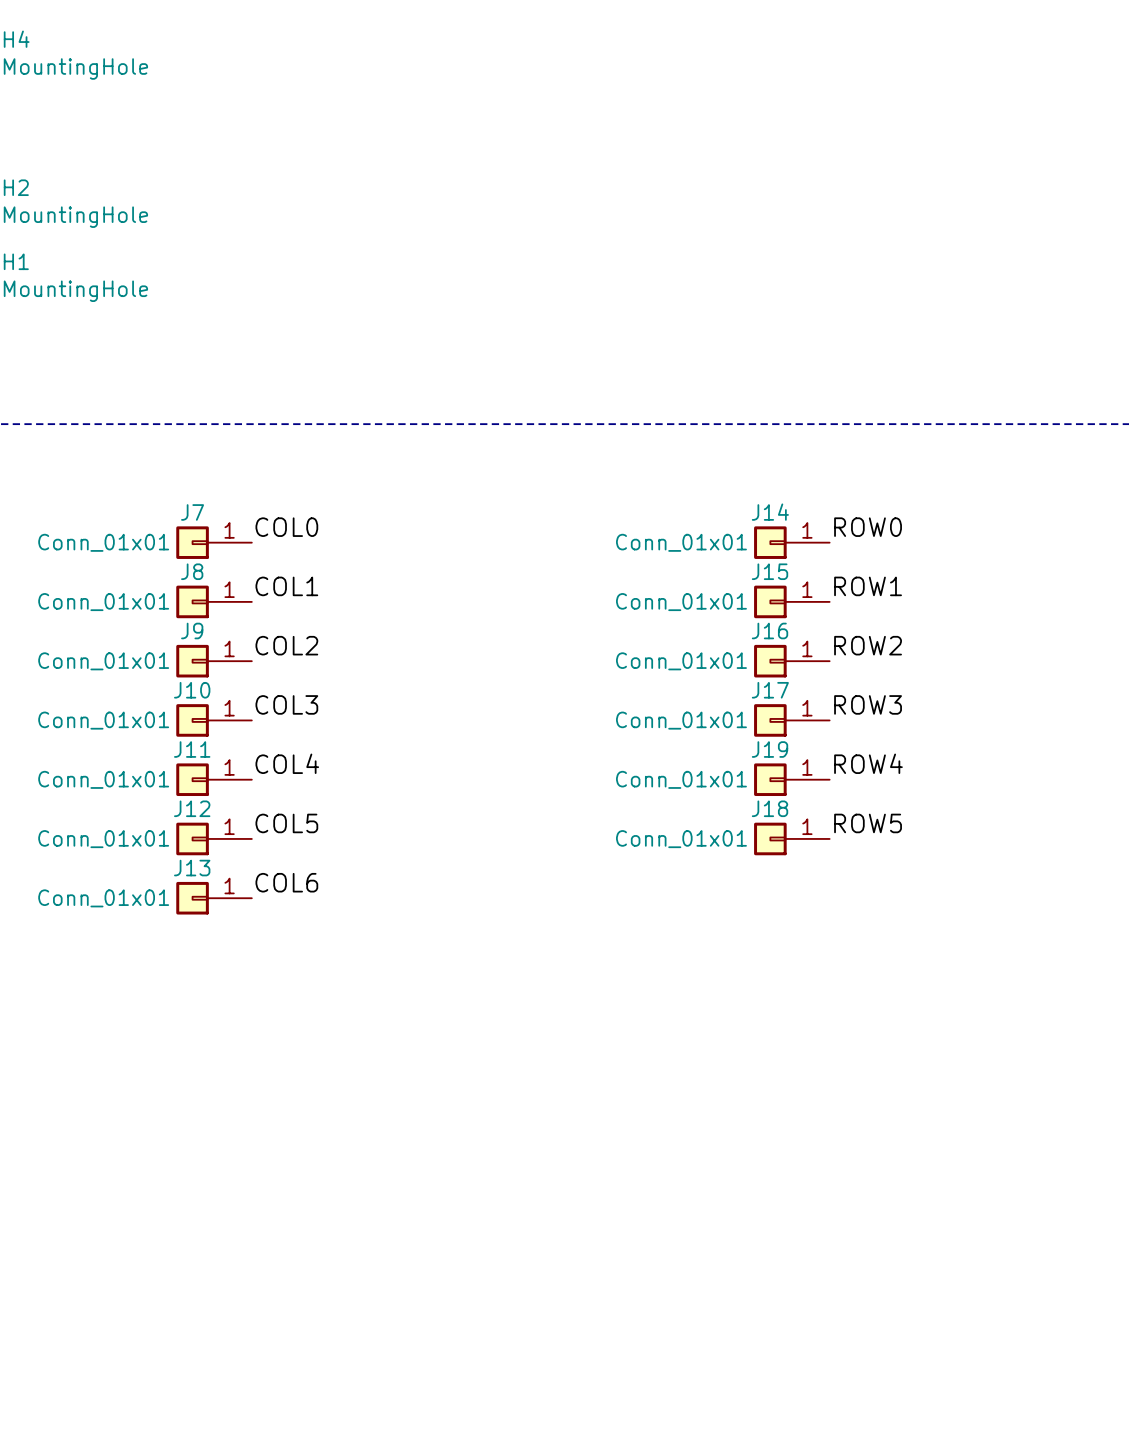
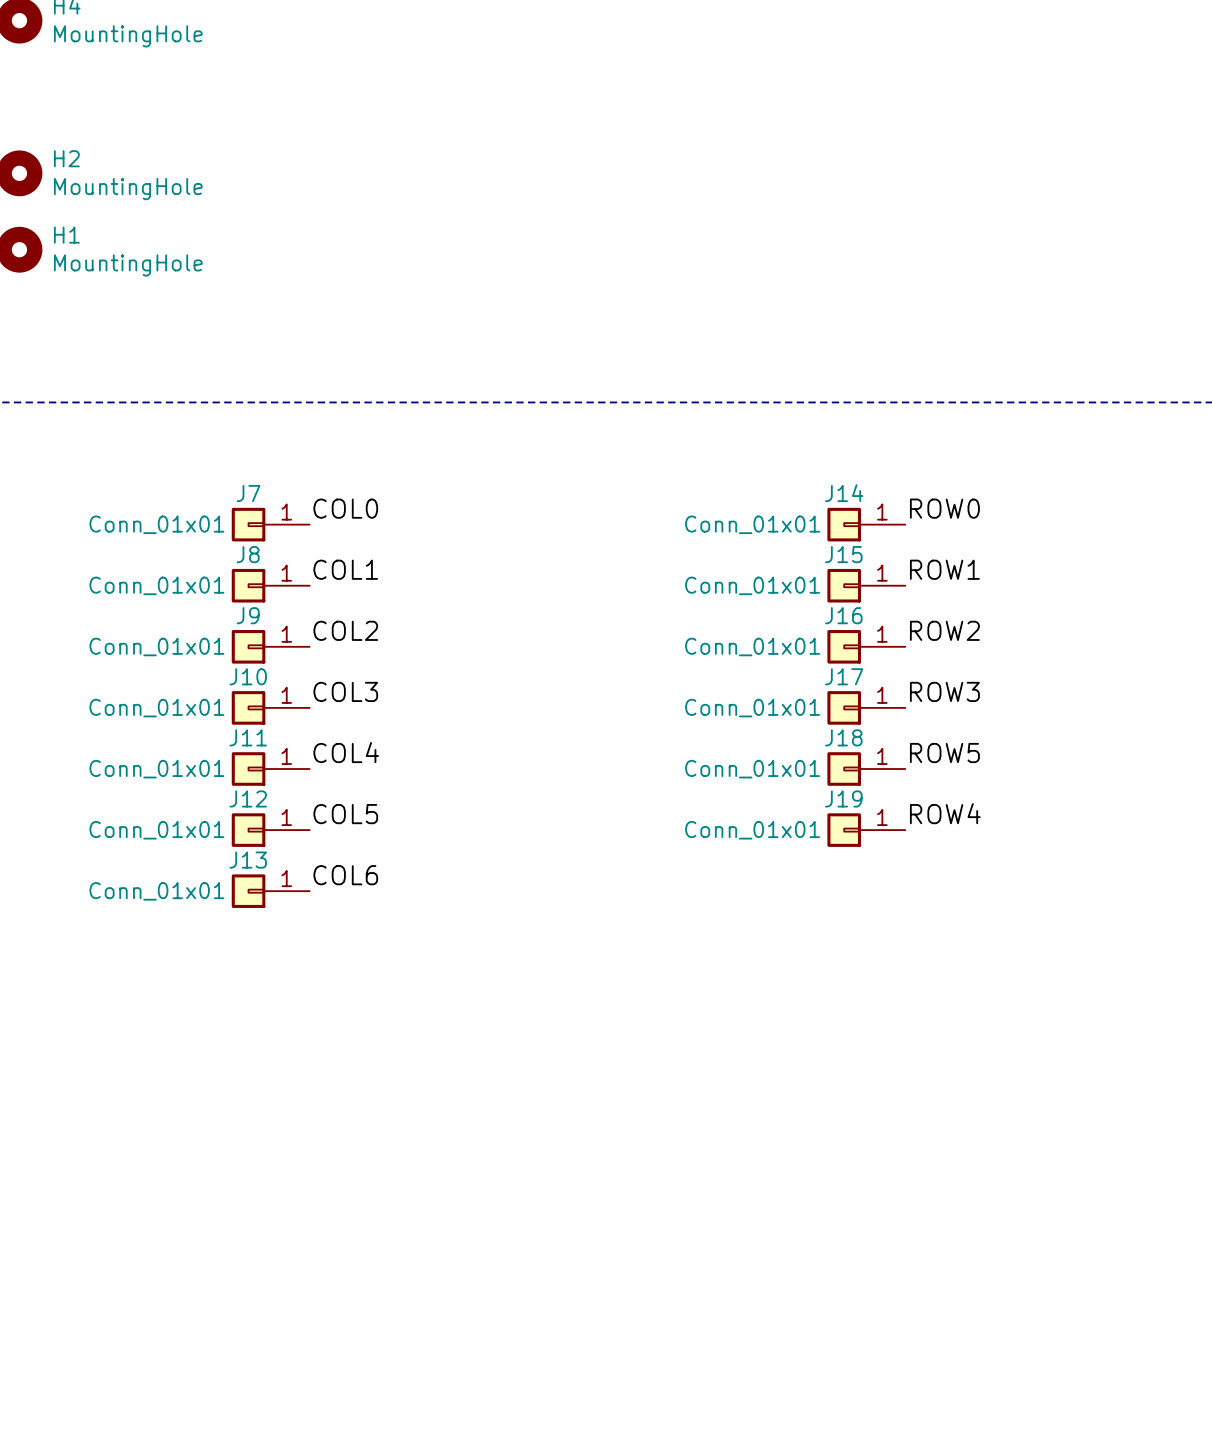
J19 name: J19 (770, 749) -> J18 (843, 737)
label: ROW4 (868, 763) -> ROW5 (944, 753)
J18 name: J18 (770, 808) -> J19 (843, 798)
label: ROW5 (868, 823) -> ROW4 (945, 813)

